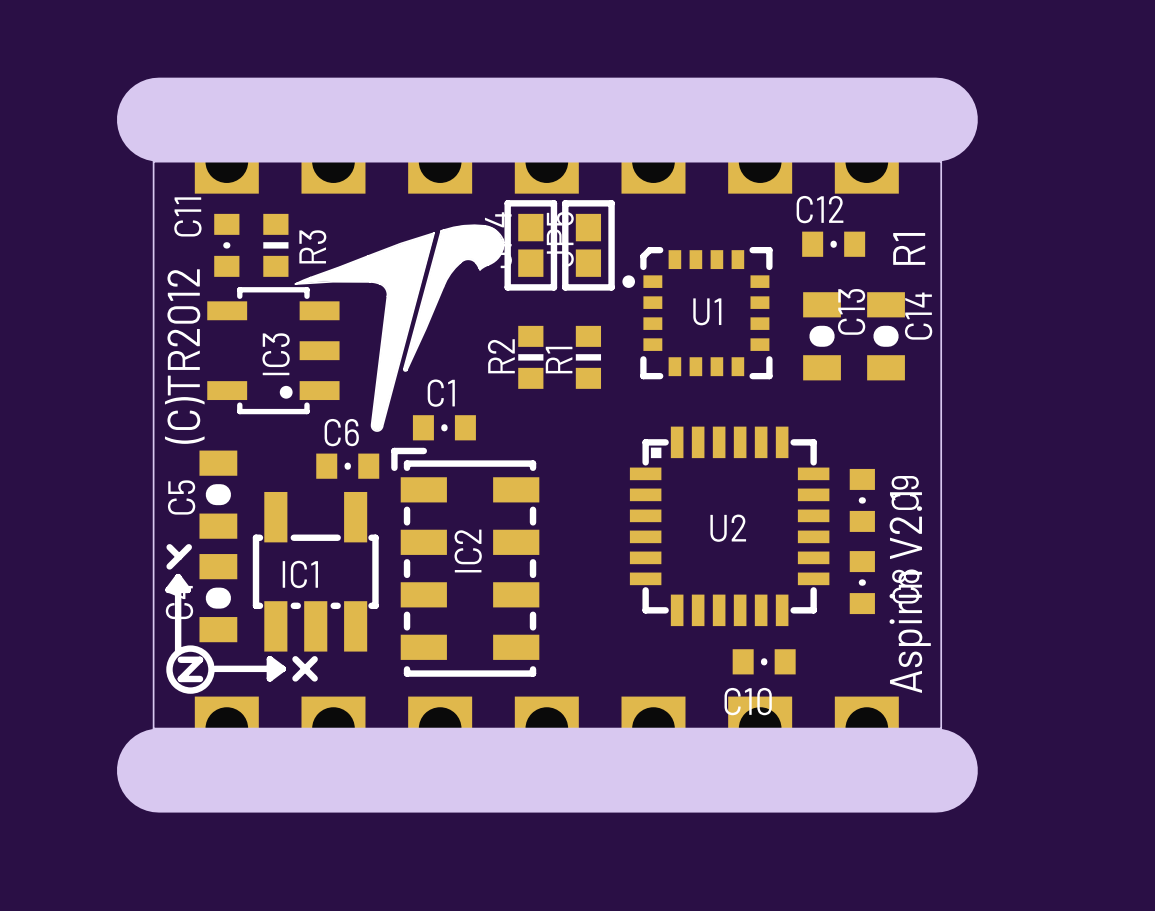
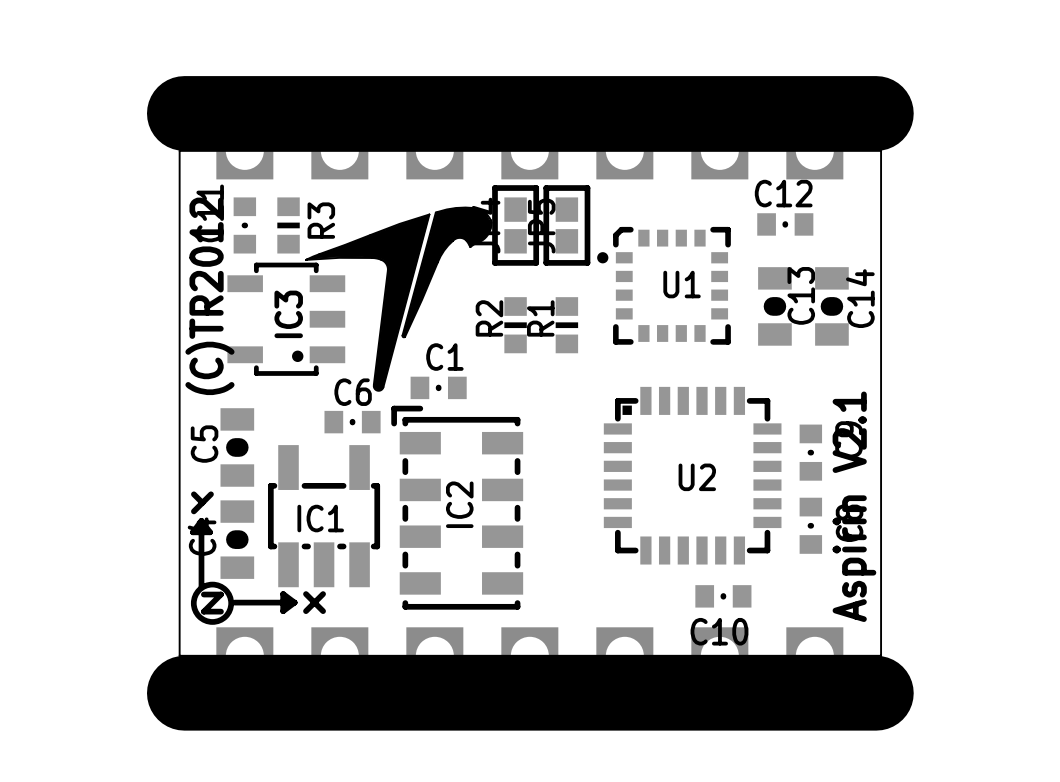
text: R1 (909, 248) -> none

